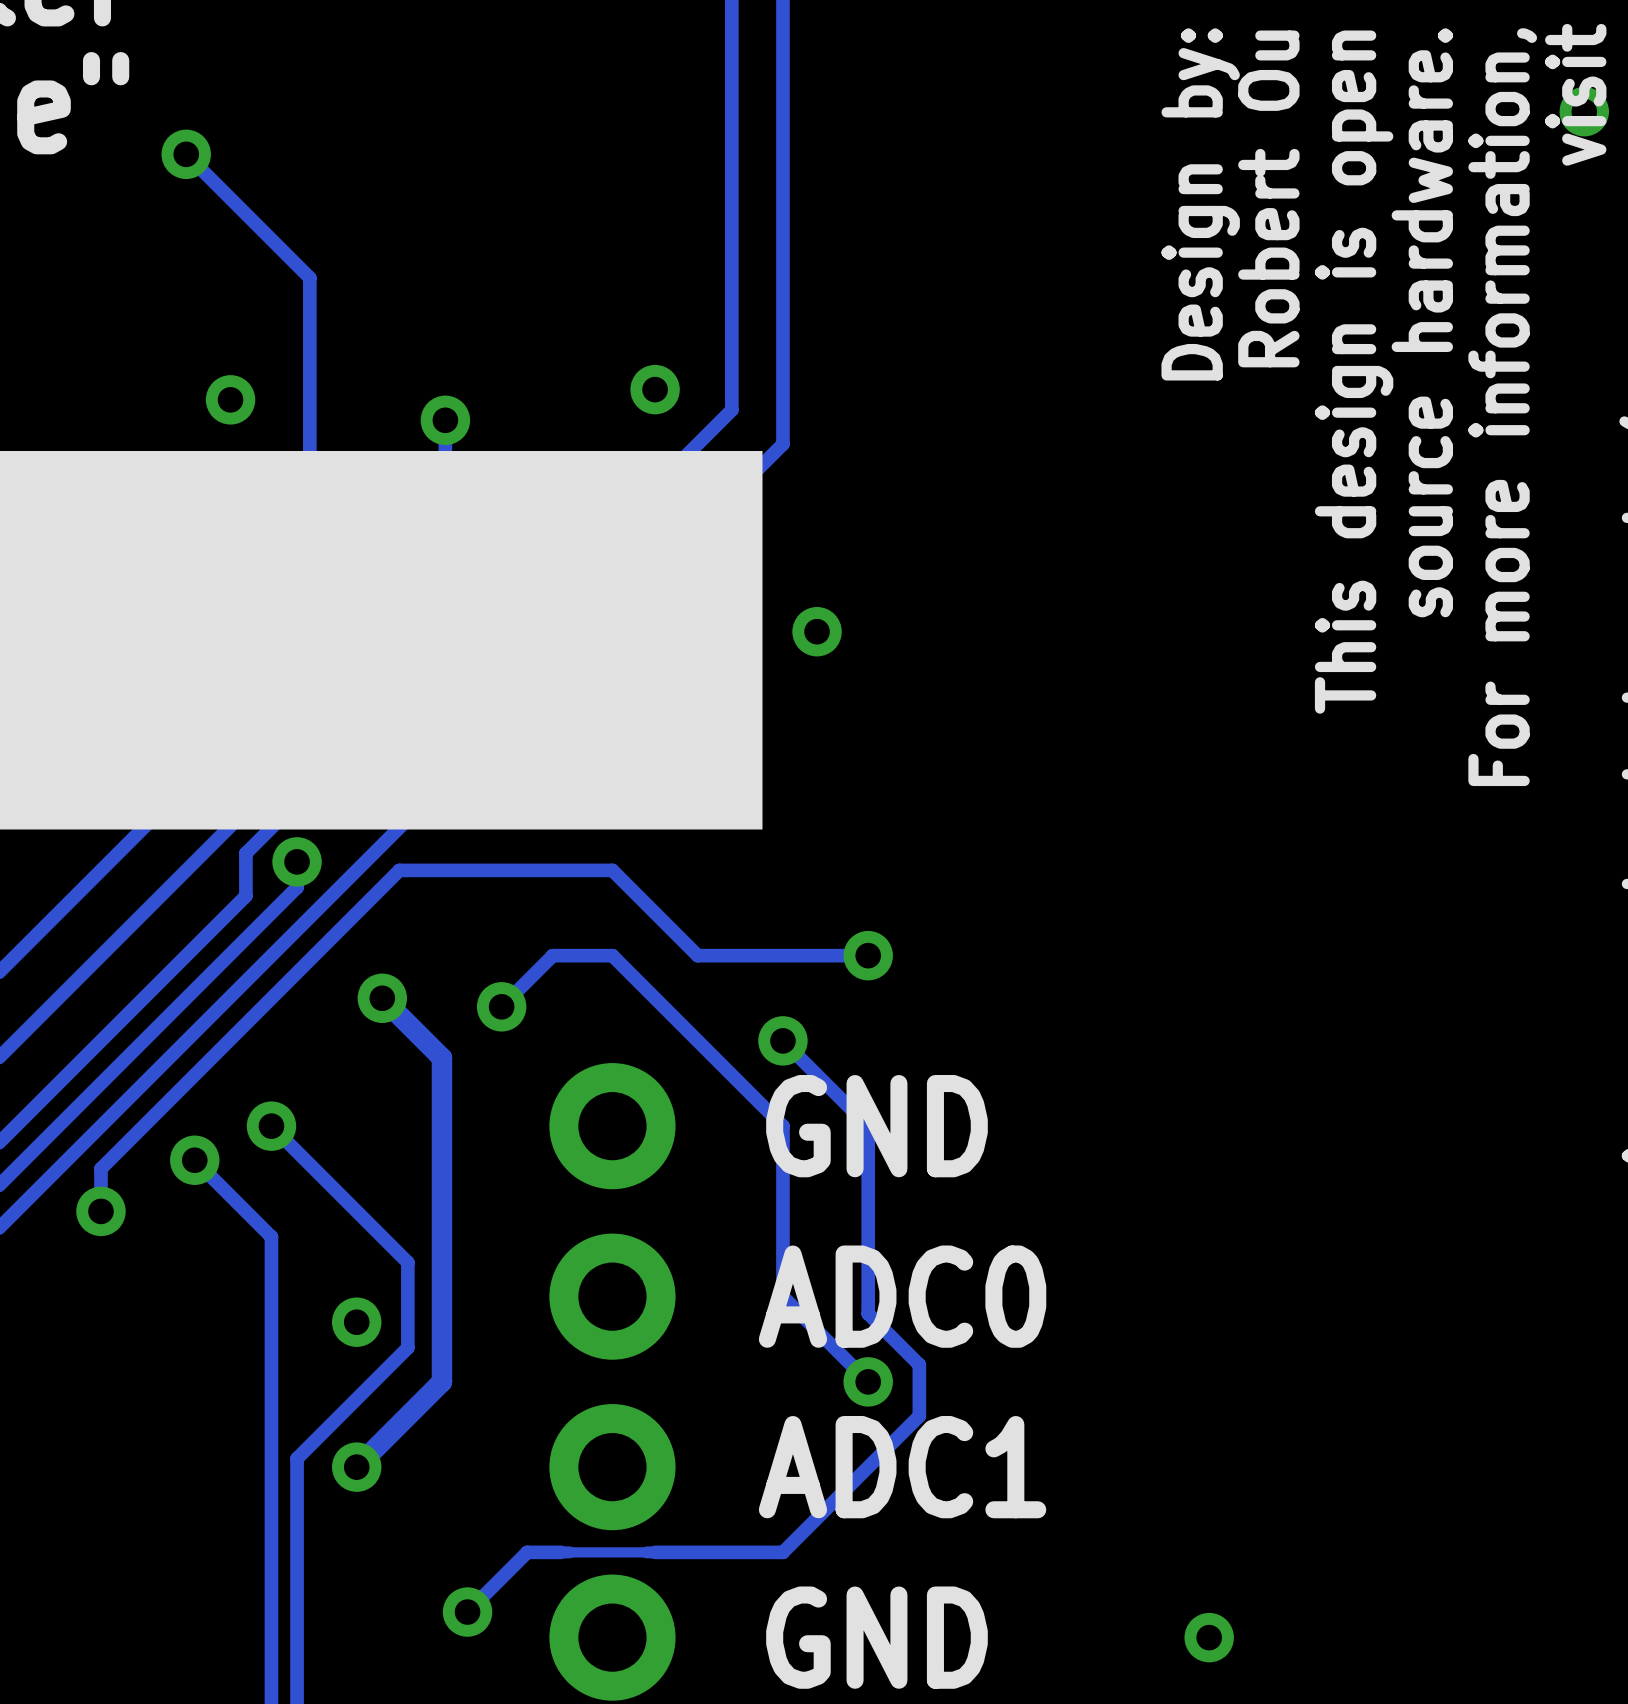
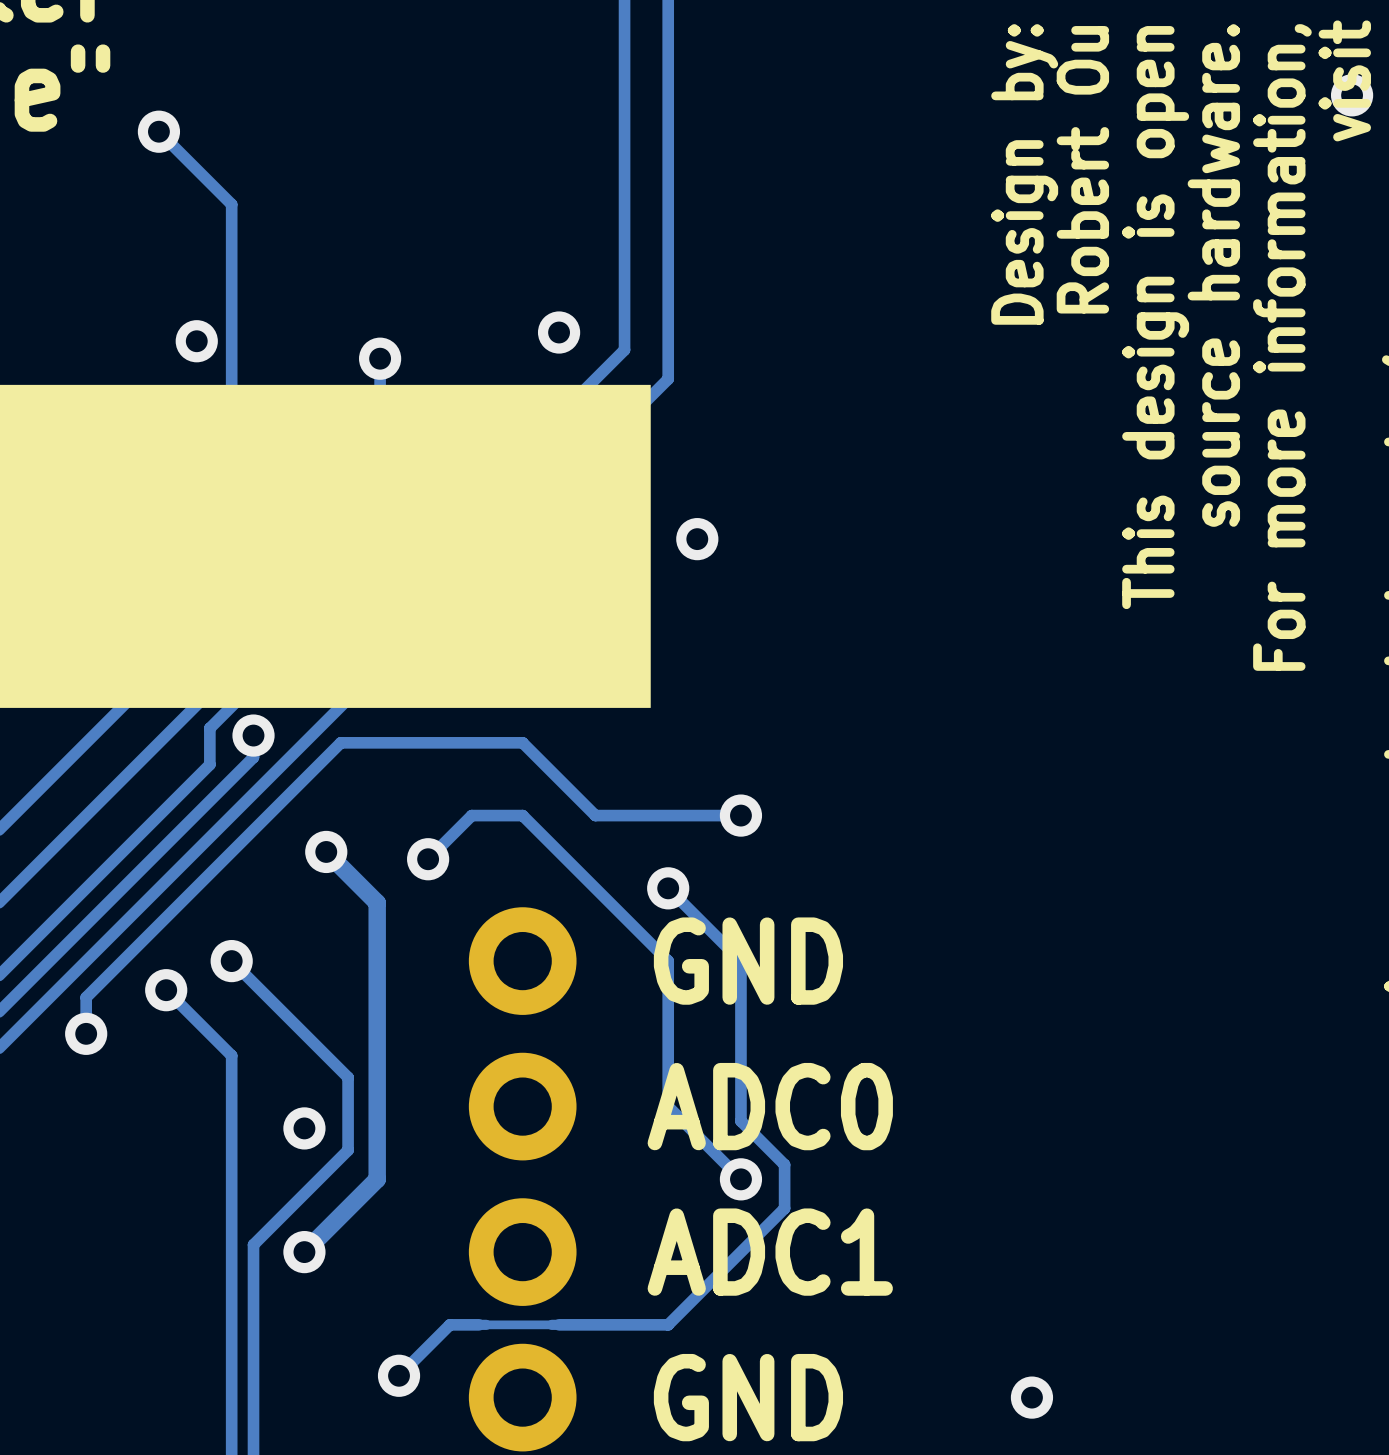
track: (271, 239) (309, 277) (309, 661) (271, 699) -> (231, 204) (231, 597)

